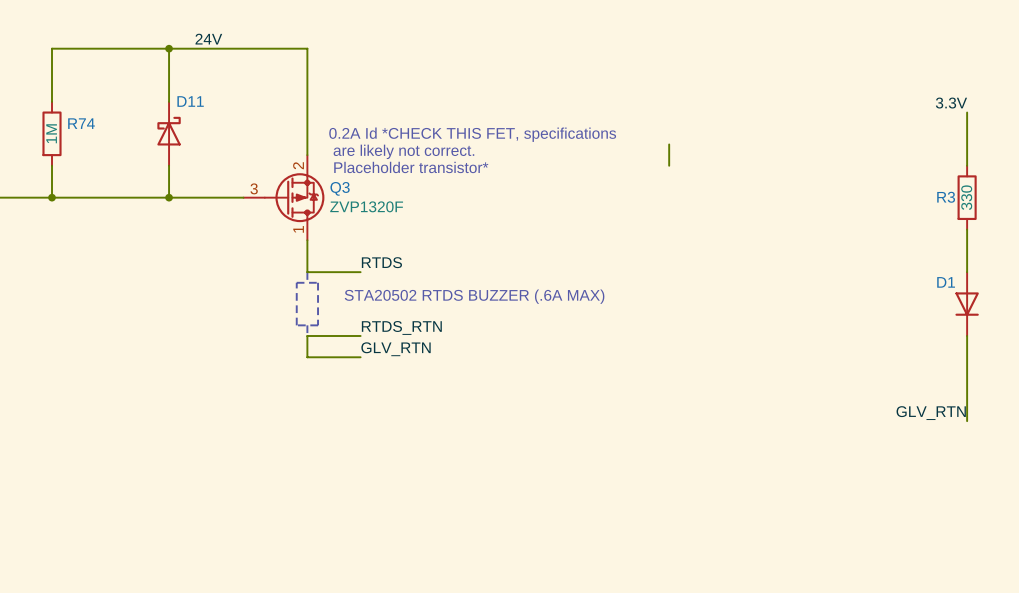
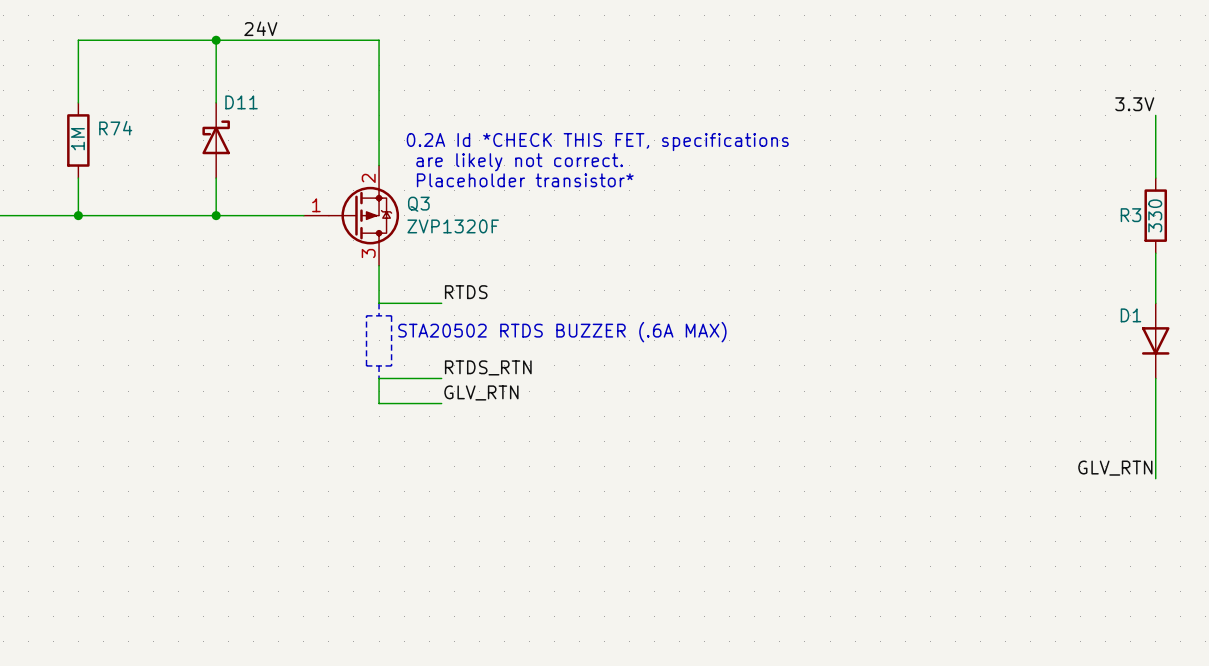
wire: (669, 144) (669, 165) -> none
Q3 pin number: 3 (254, 188) -> 1 (316, 205)
Q3 pin number: 1 (298, 229) -> 3 (368, 253)

